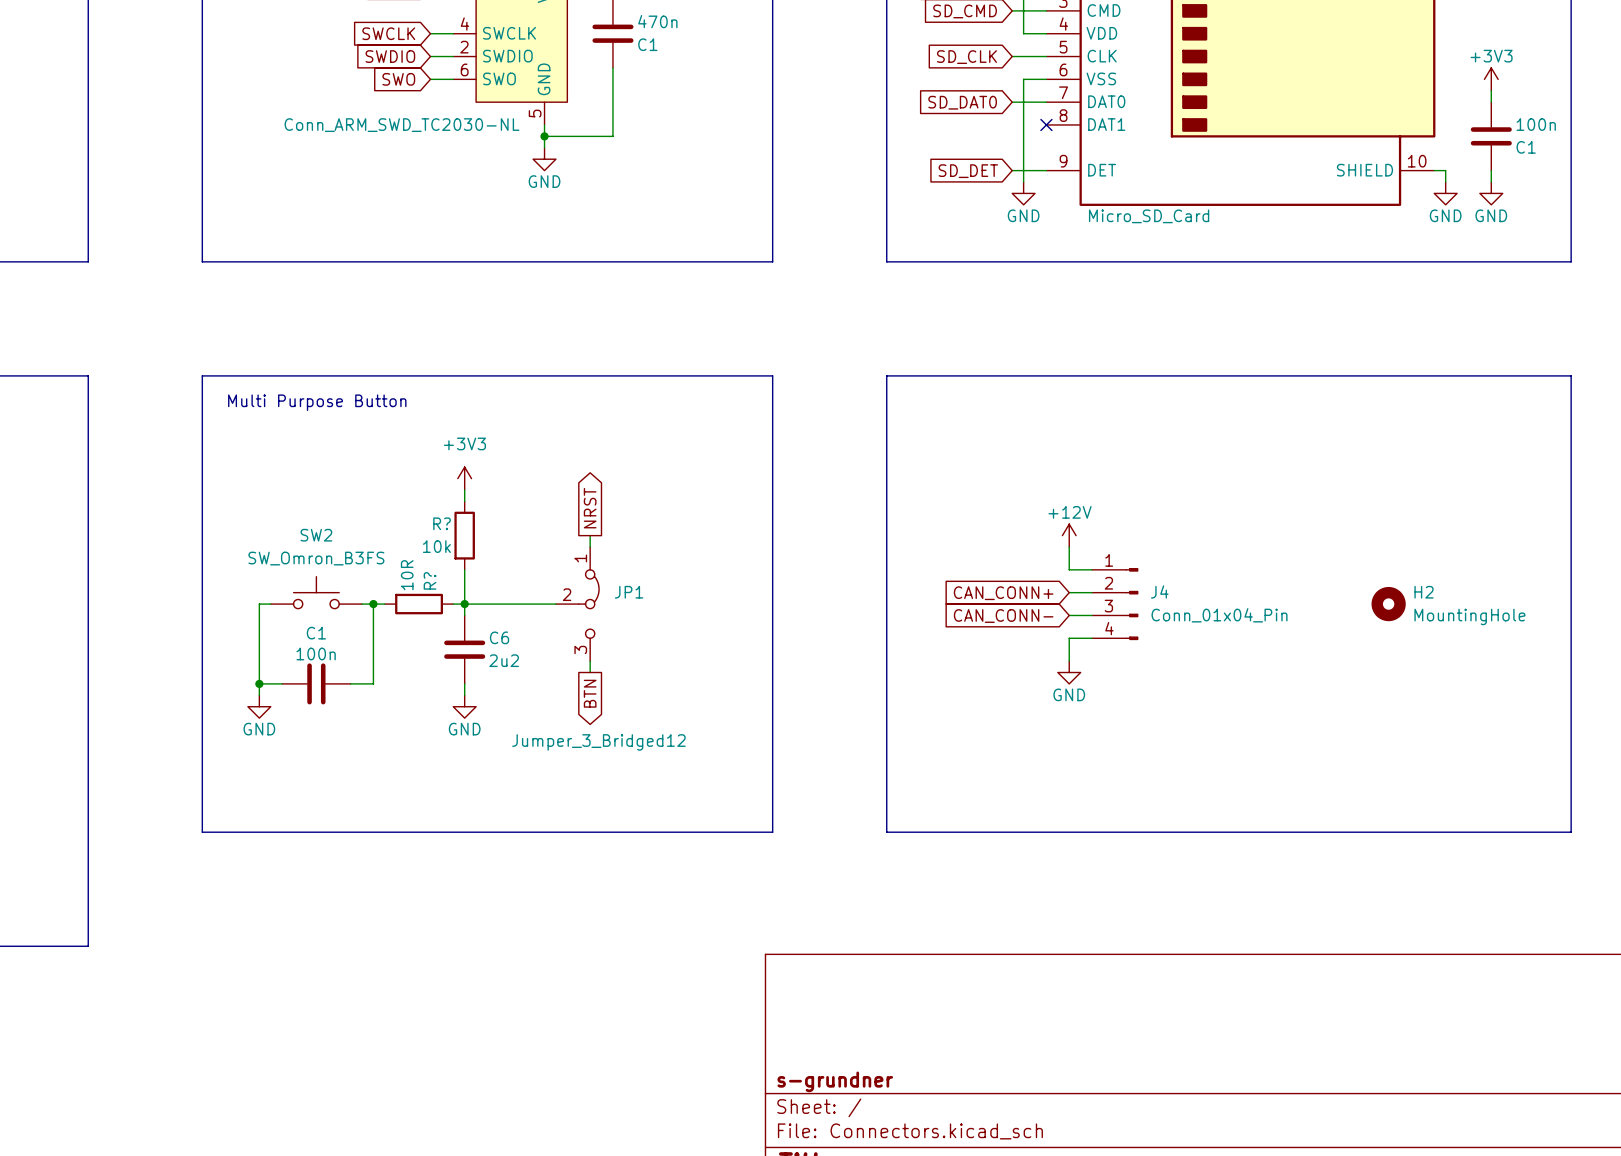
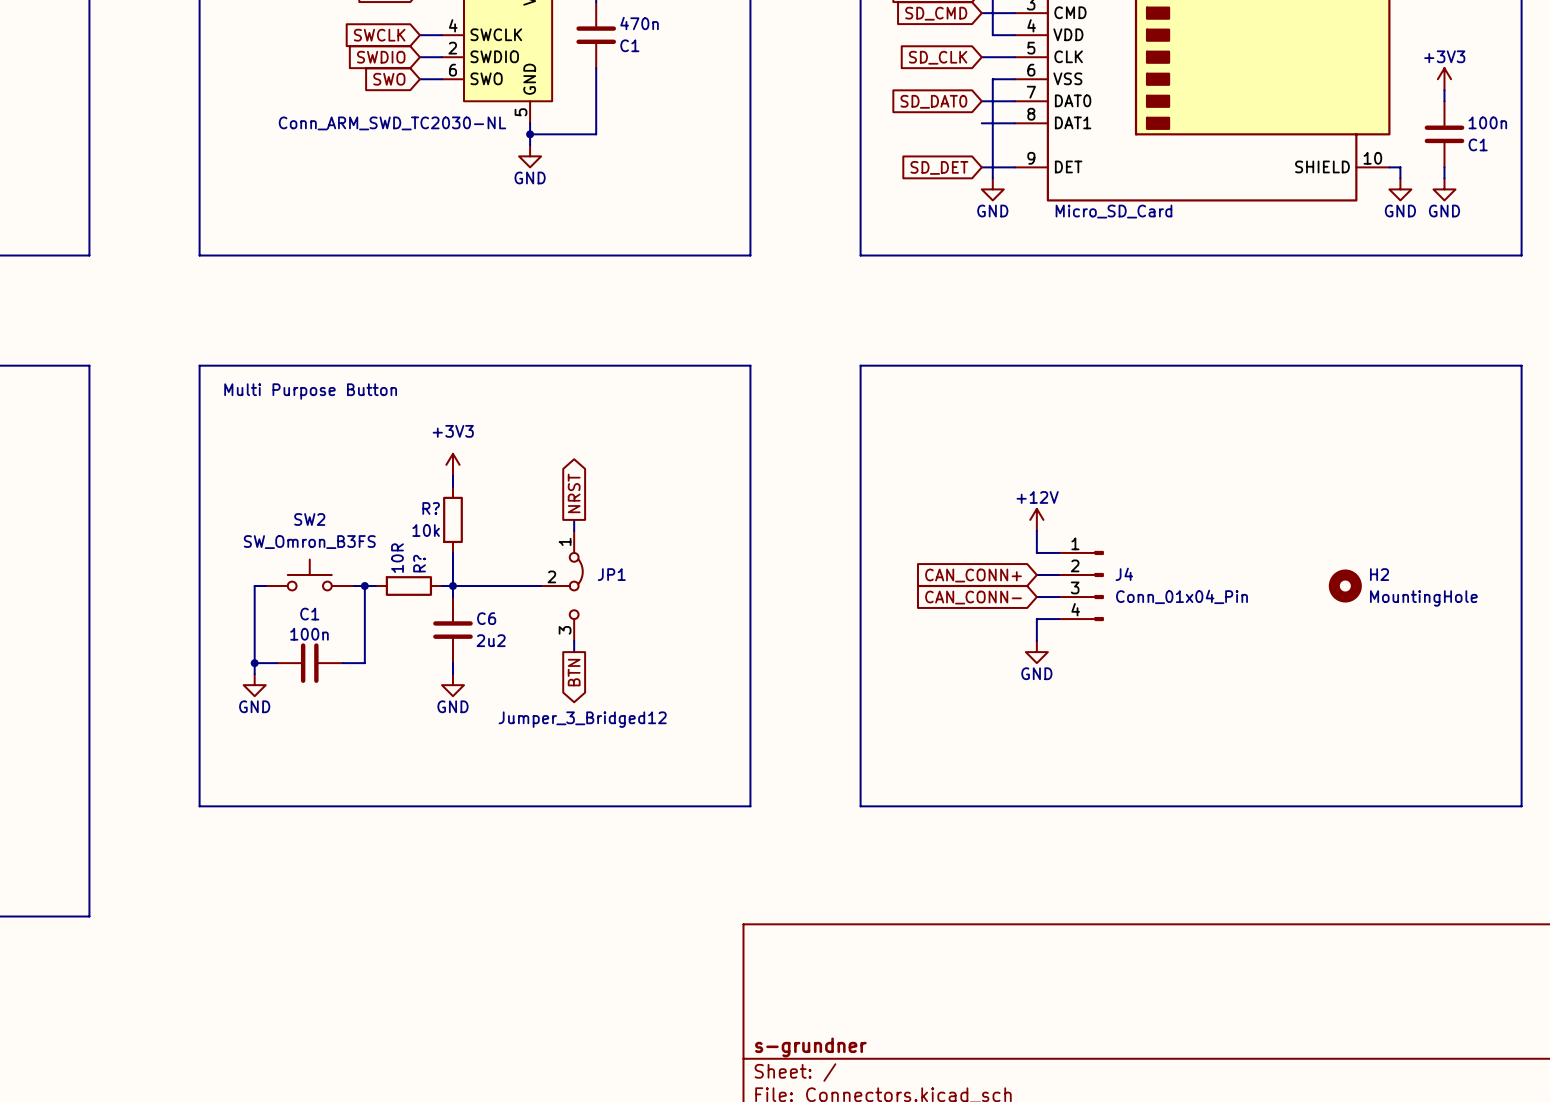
wire: none -> (981, 123) (1014, 123)
no-connect mark: (1046, 124) -> none

